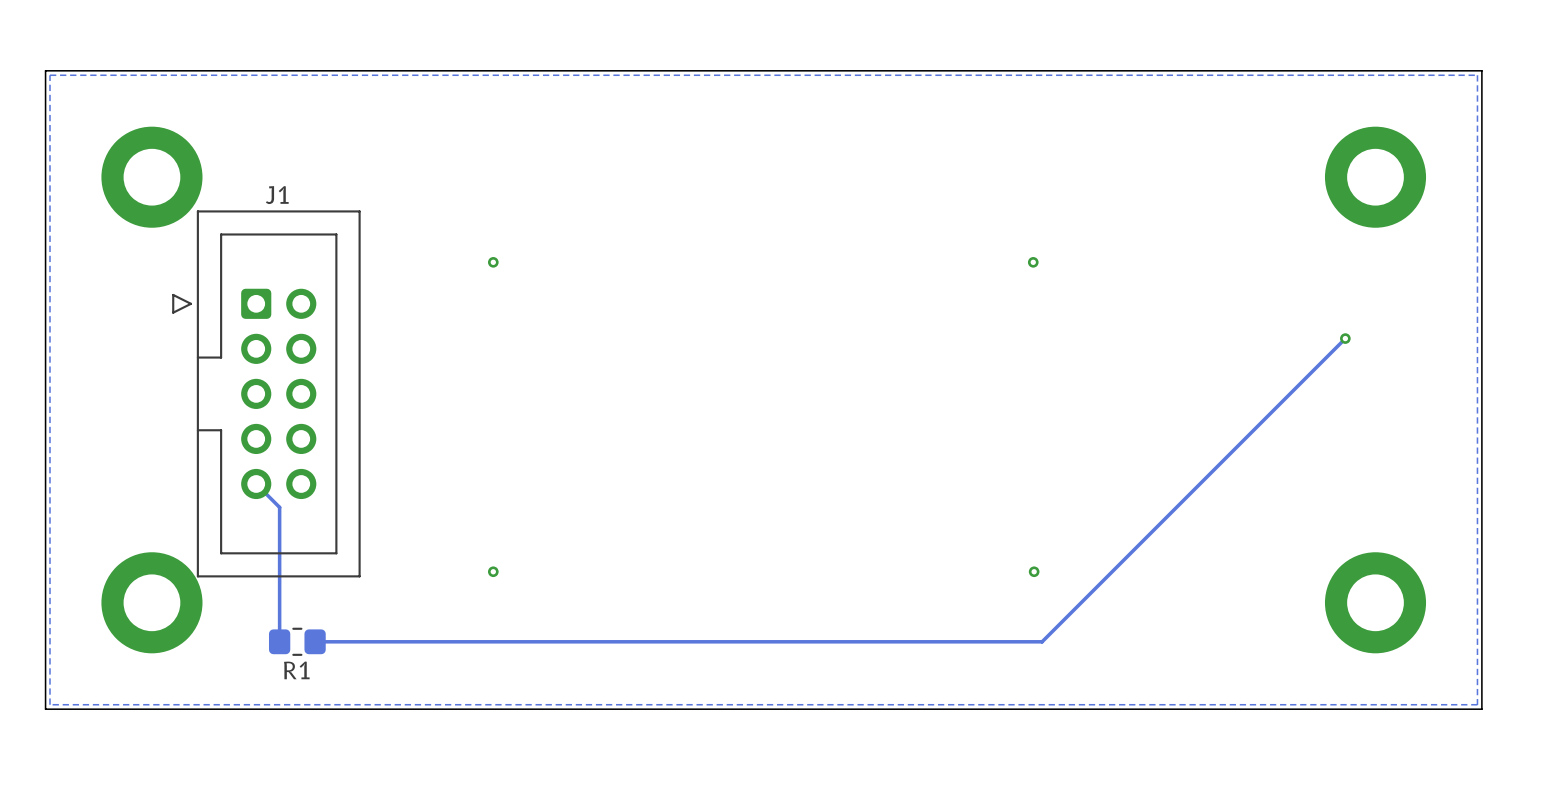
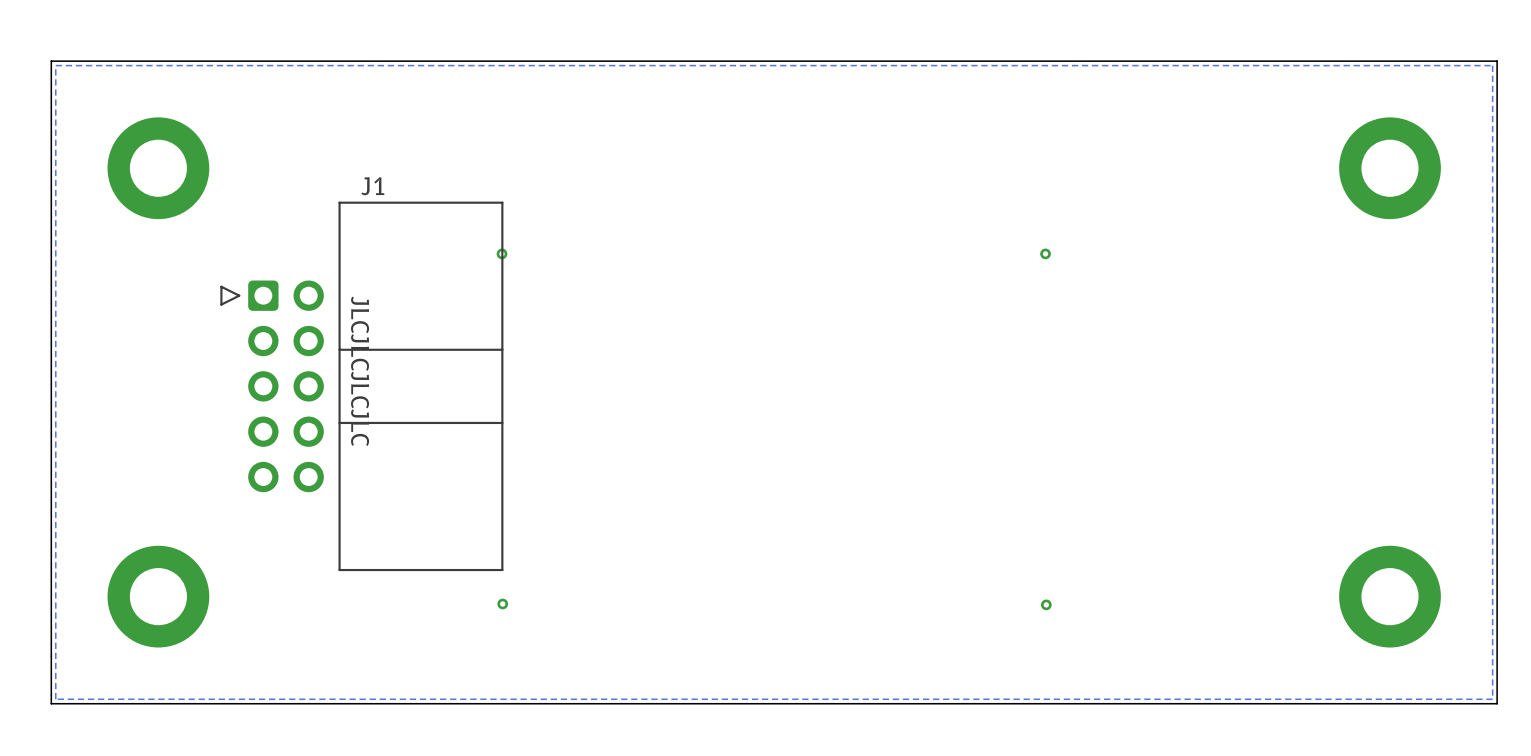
J1 footprint: [172, 210, 361, 578] -> [220, 201, 504, 572]
track: (1345, 338) (1042, 641) (315, 641) -> none
via: (1345, 338) -> none
text: none -> JLCJLCJLCJLC (360, 371)
track: (256, 483) (279, 507) (279, 641) -> none
via position: (493, 571) -> (502, 603)
via position: (1034, 571) -> (1046, 604)
R1: (297, 641) -> none

